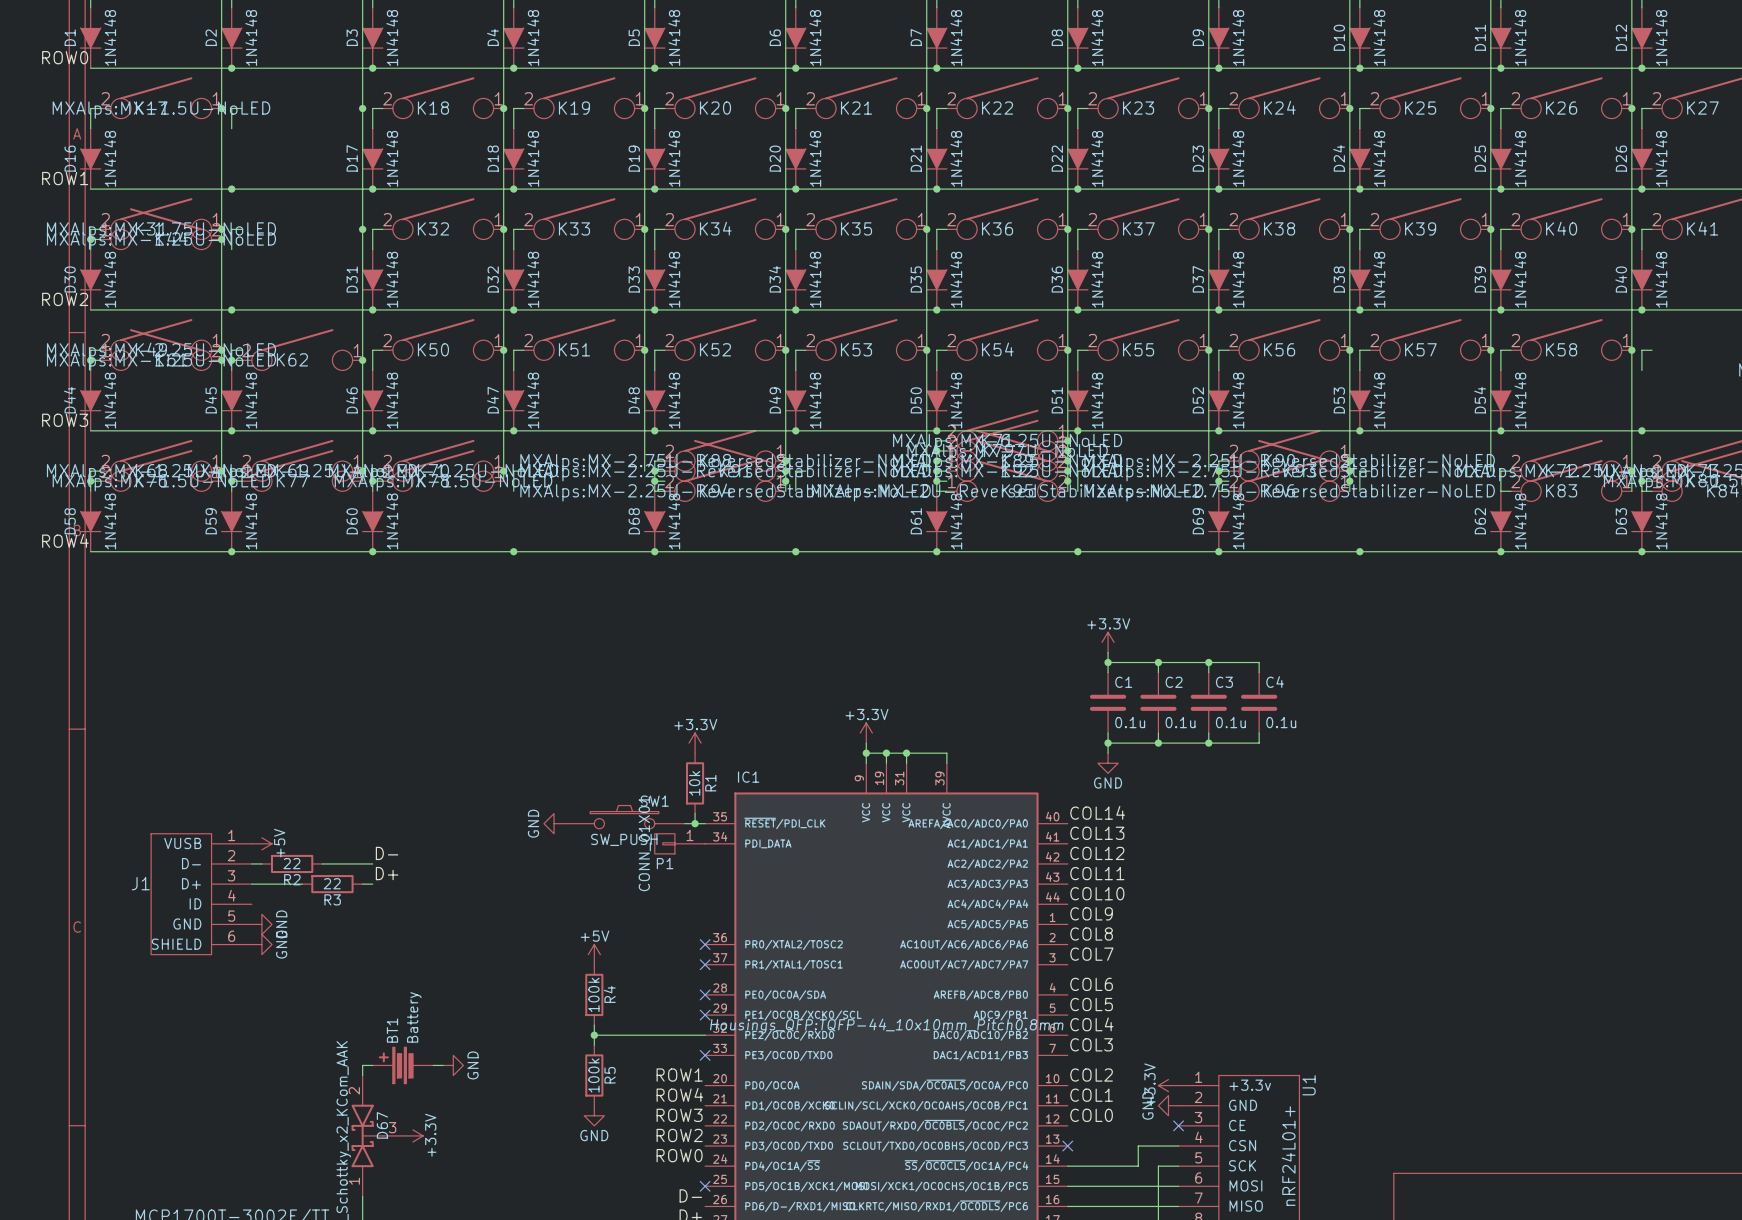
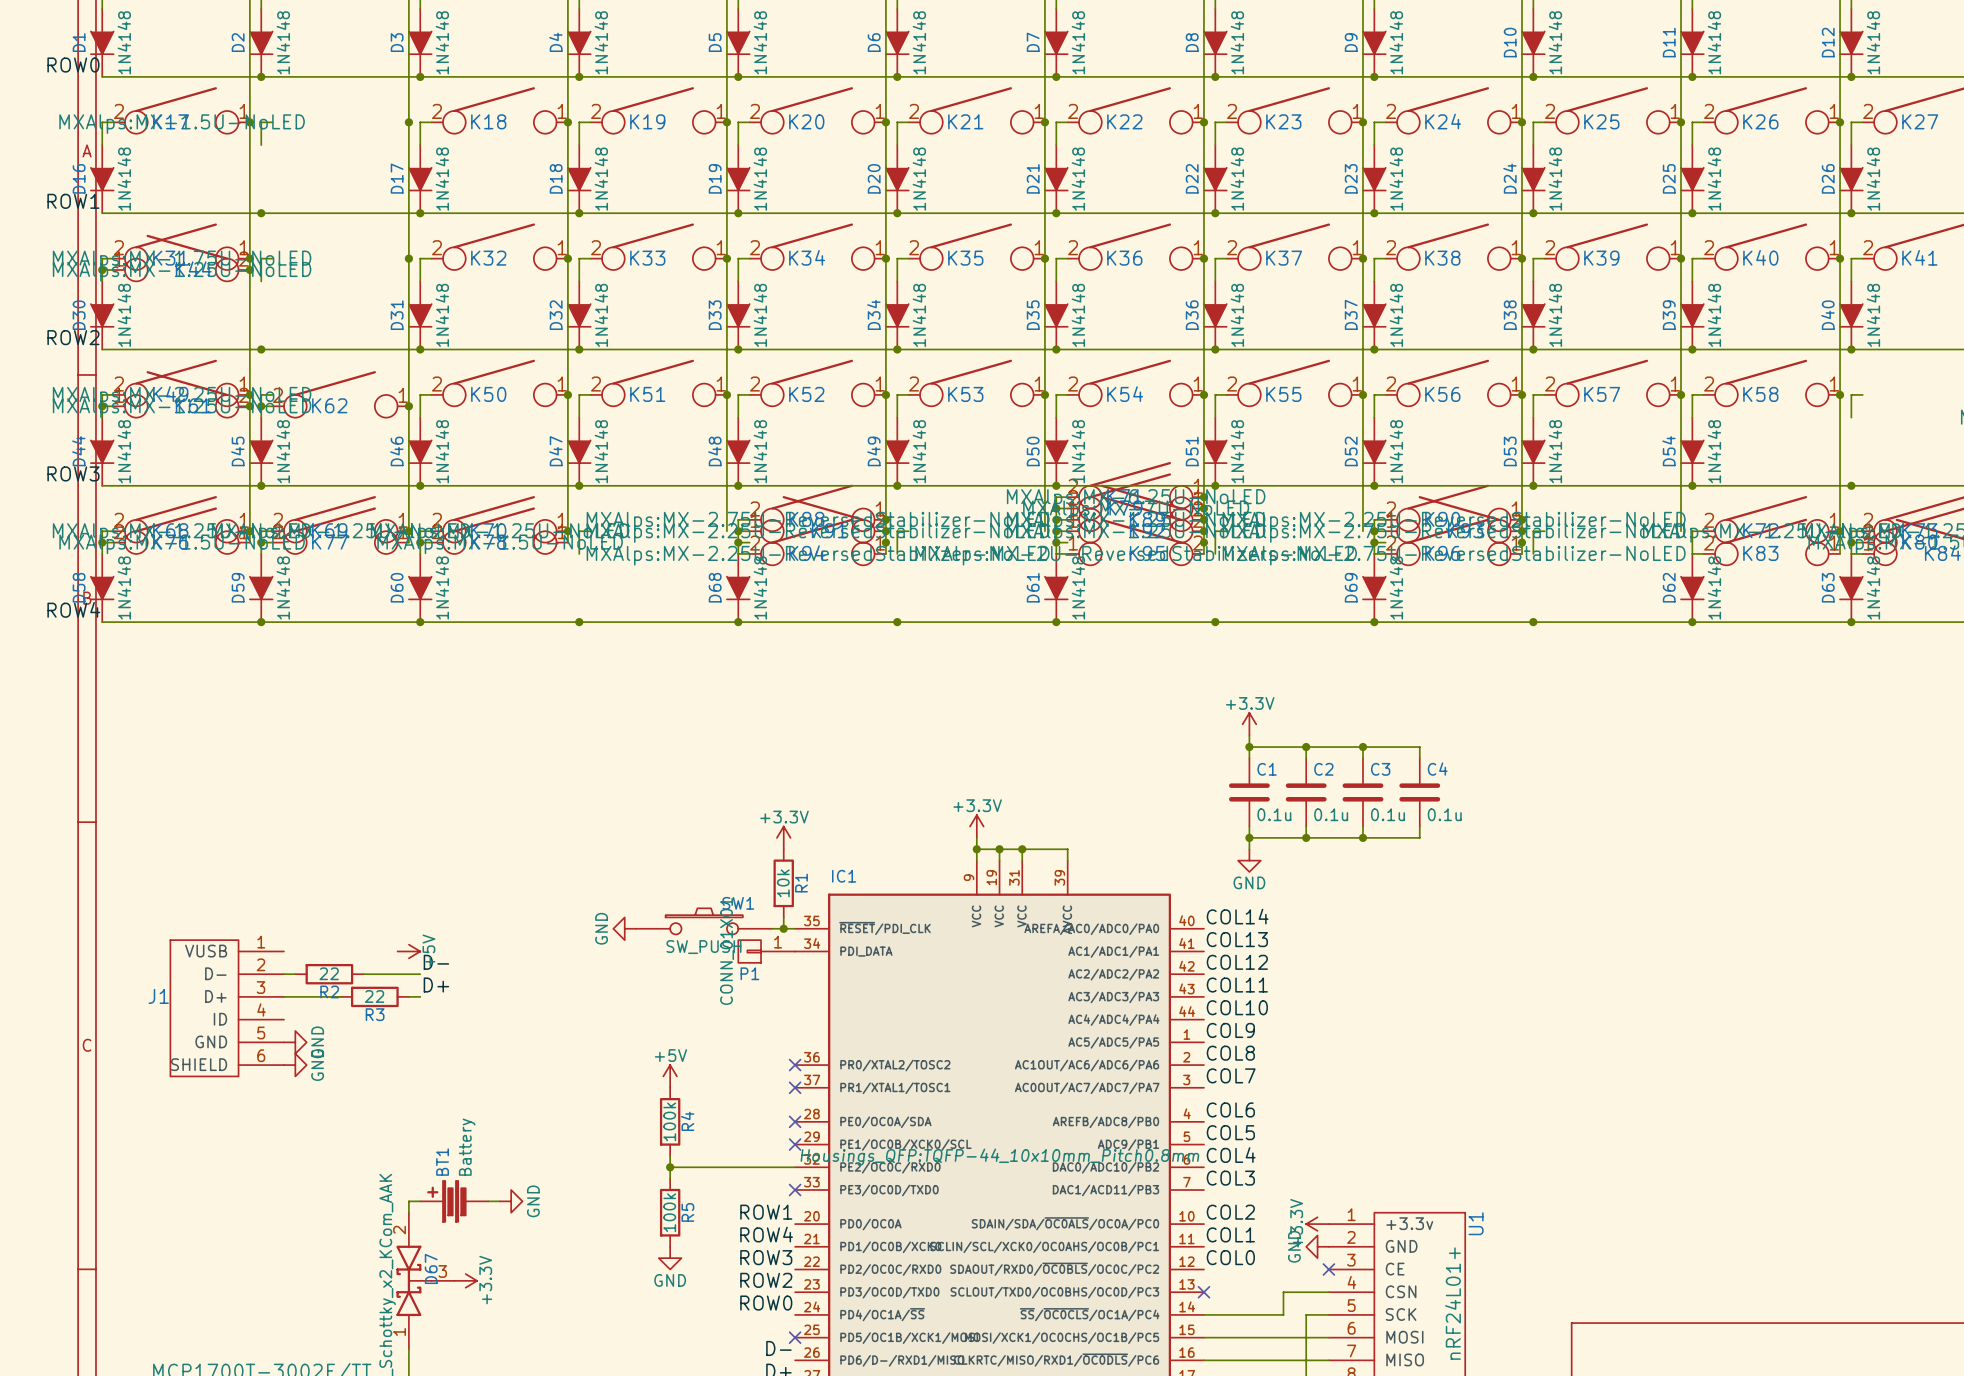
power symbol position: +5V (261, 843) -> +5V (408, 951)

